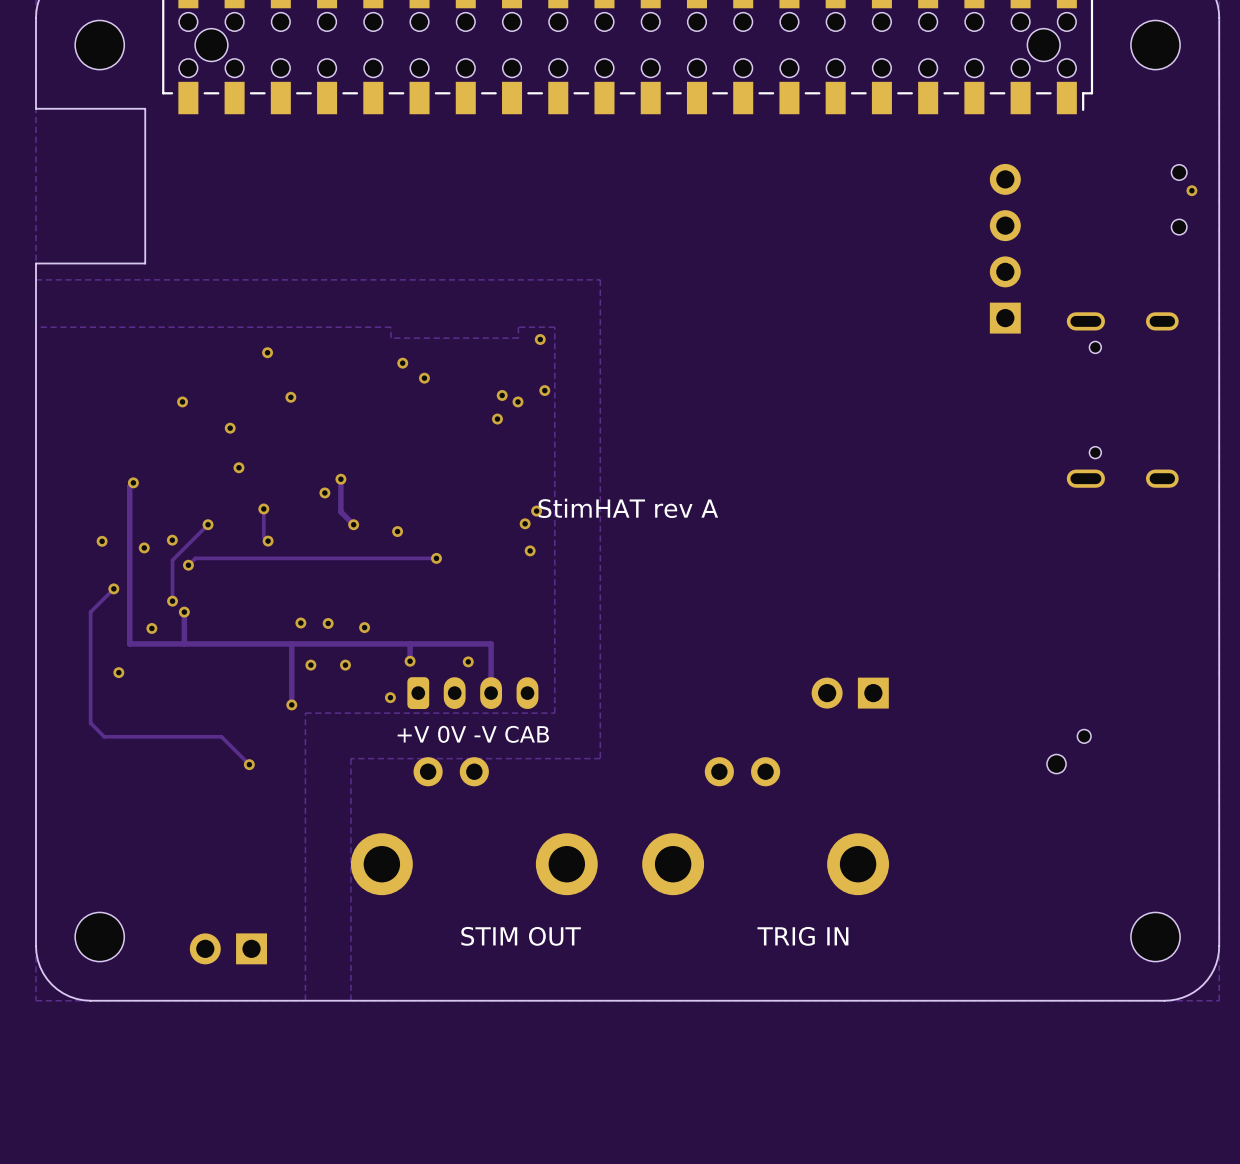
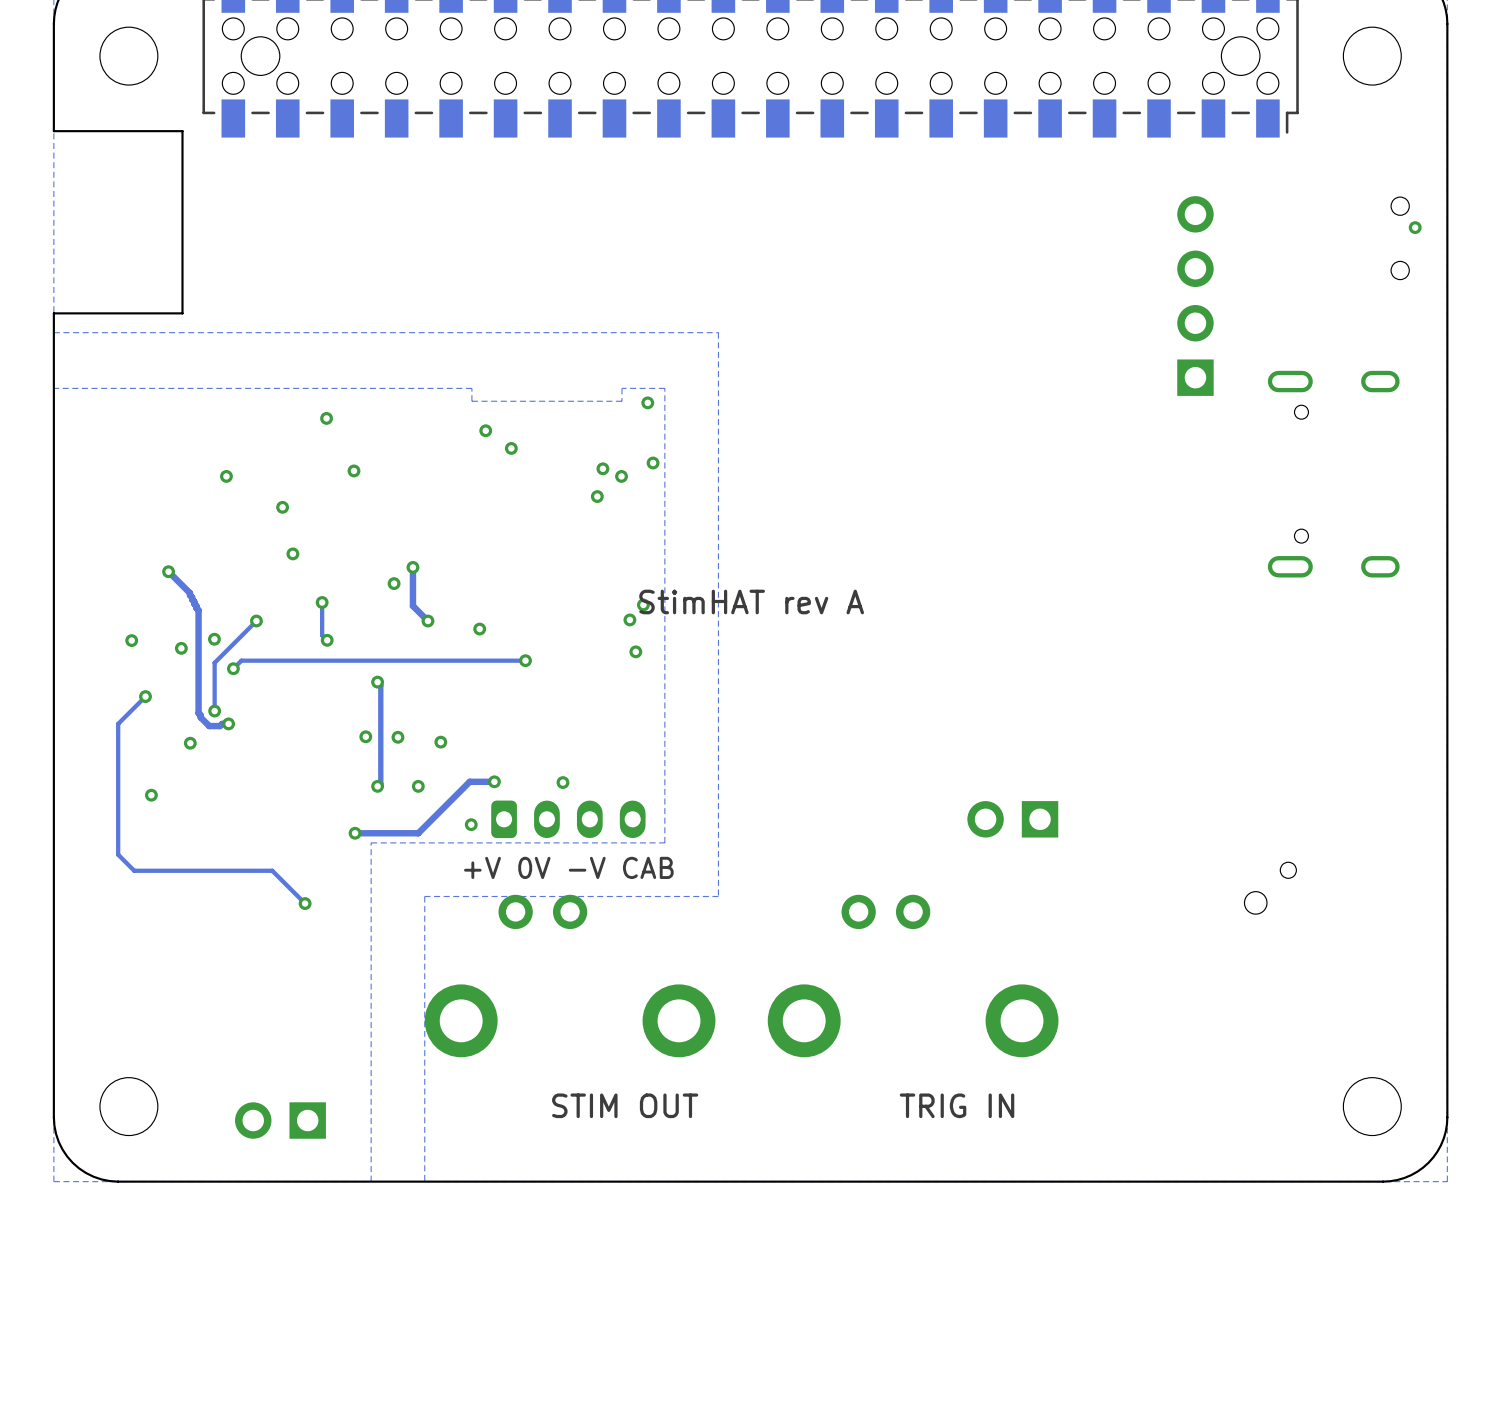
track: (133, 482) (129, 486) (129, 643) (491, 643) (491, 693) -> none
track: none -> (377, 682) (380, 685) (380, 783) (377, 787)
via: none -> (377, 682)
track: (184, 612) (184, 643) -> (228, 723) (209, 726) (198, 713) (198, 610) (190, 593) (168, 571)
track: (291, 643) (291, 704) -> (494, 781) (469, 781) (418, 833) (355, 833)
track: (410, 643) (410, 661) -> none

